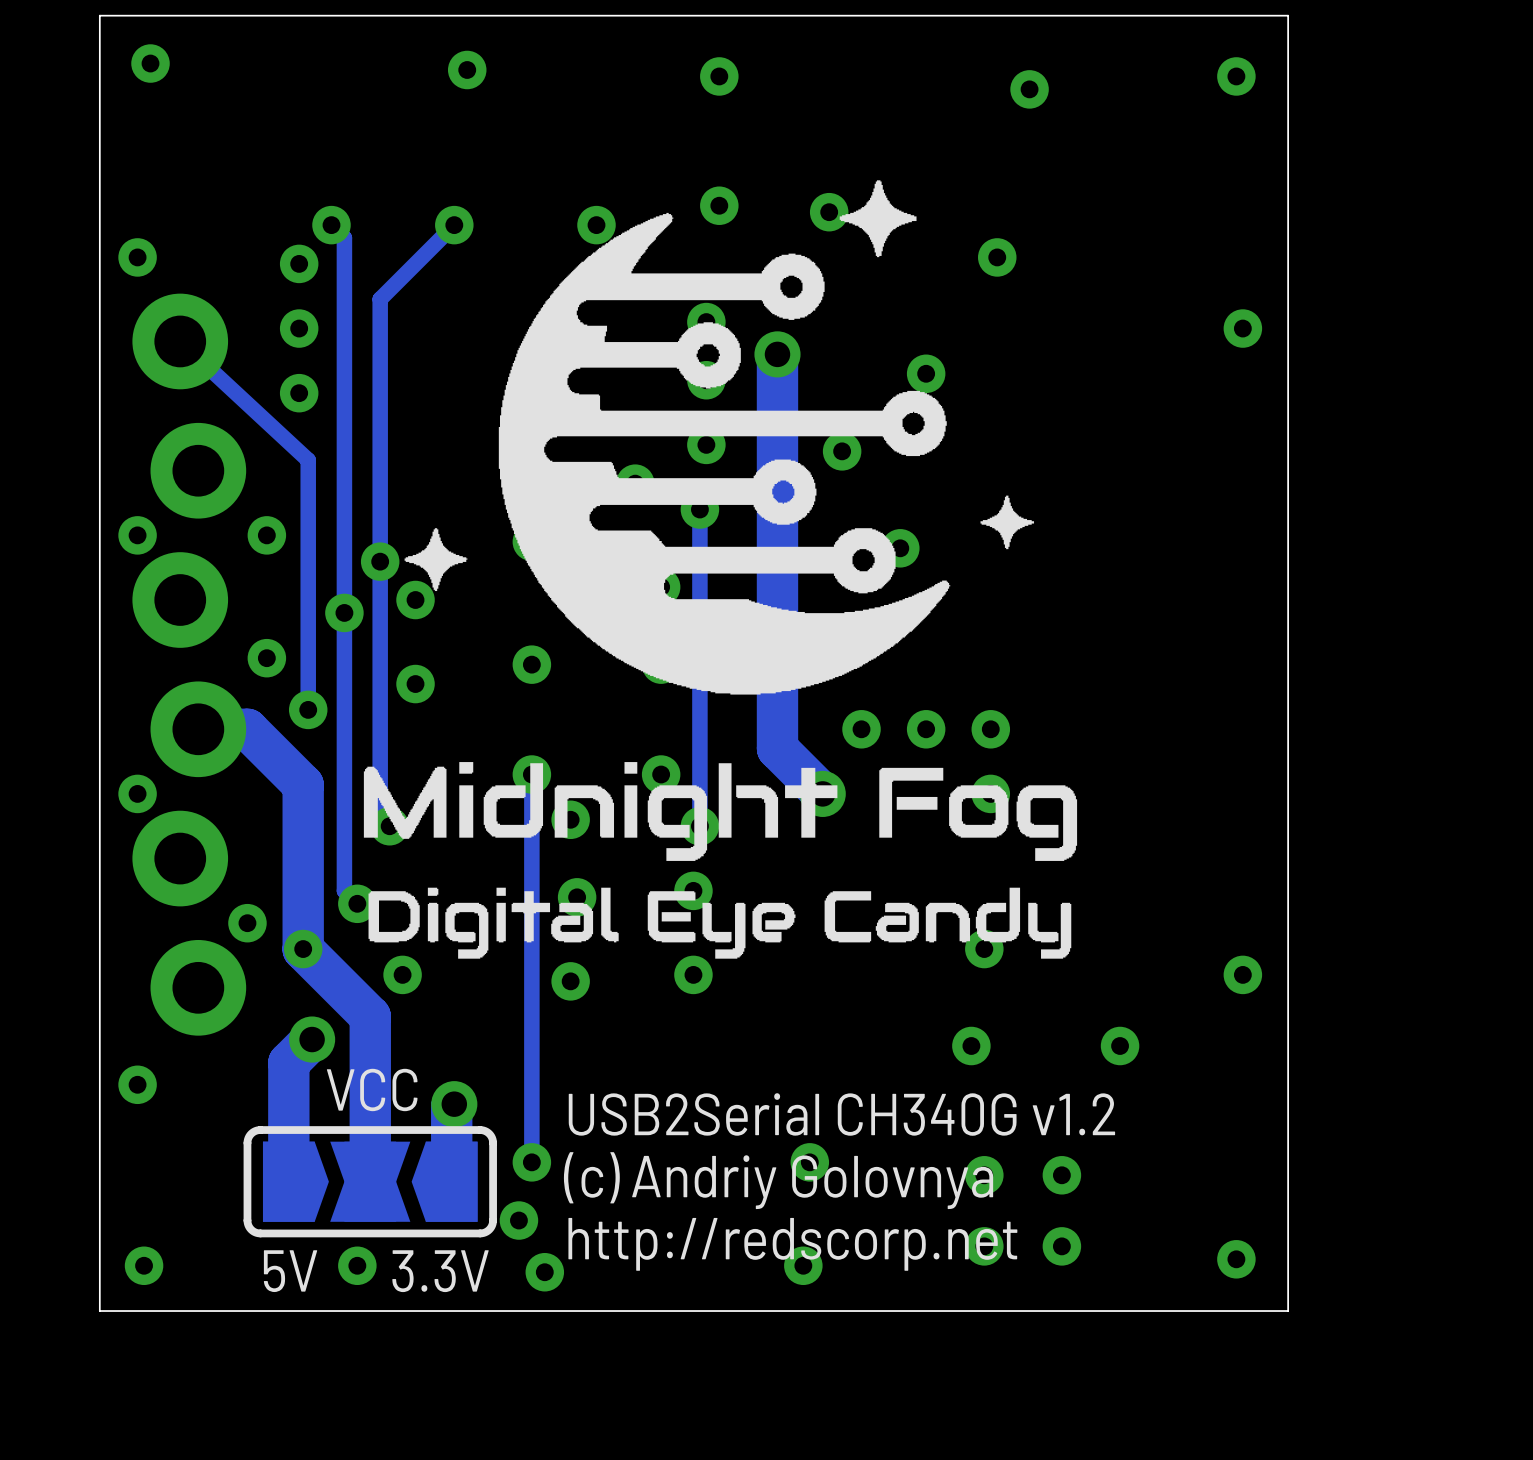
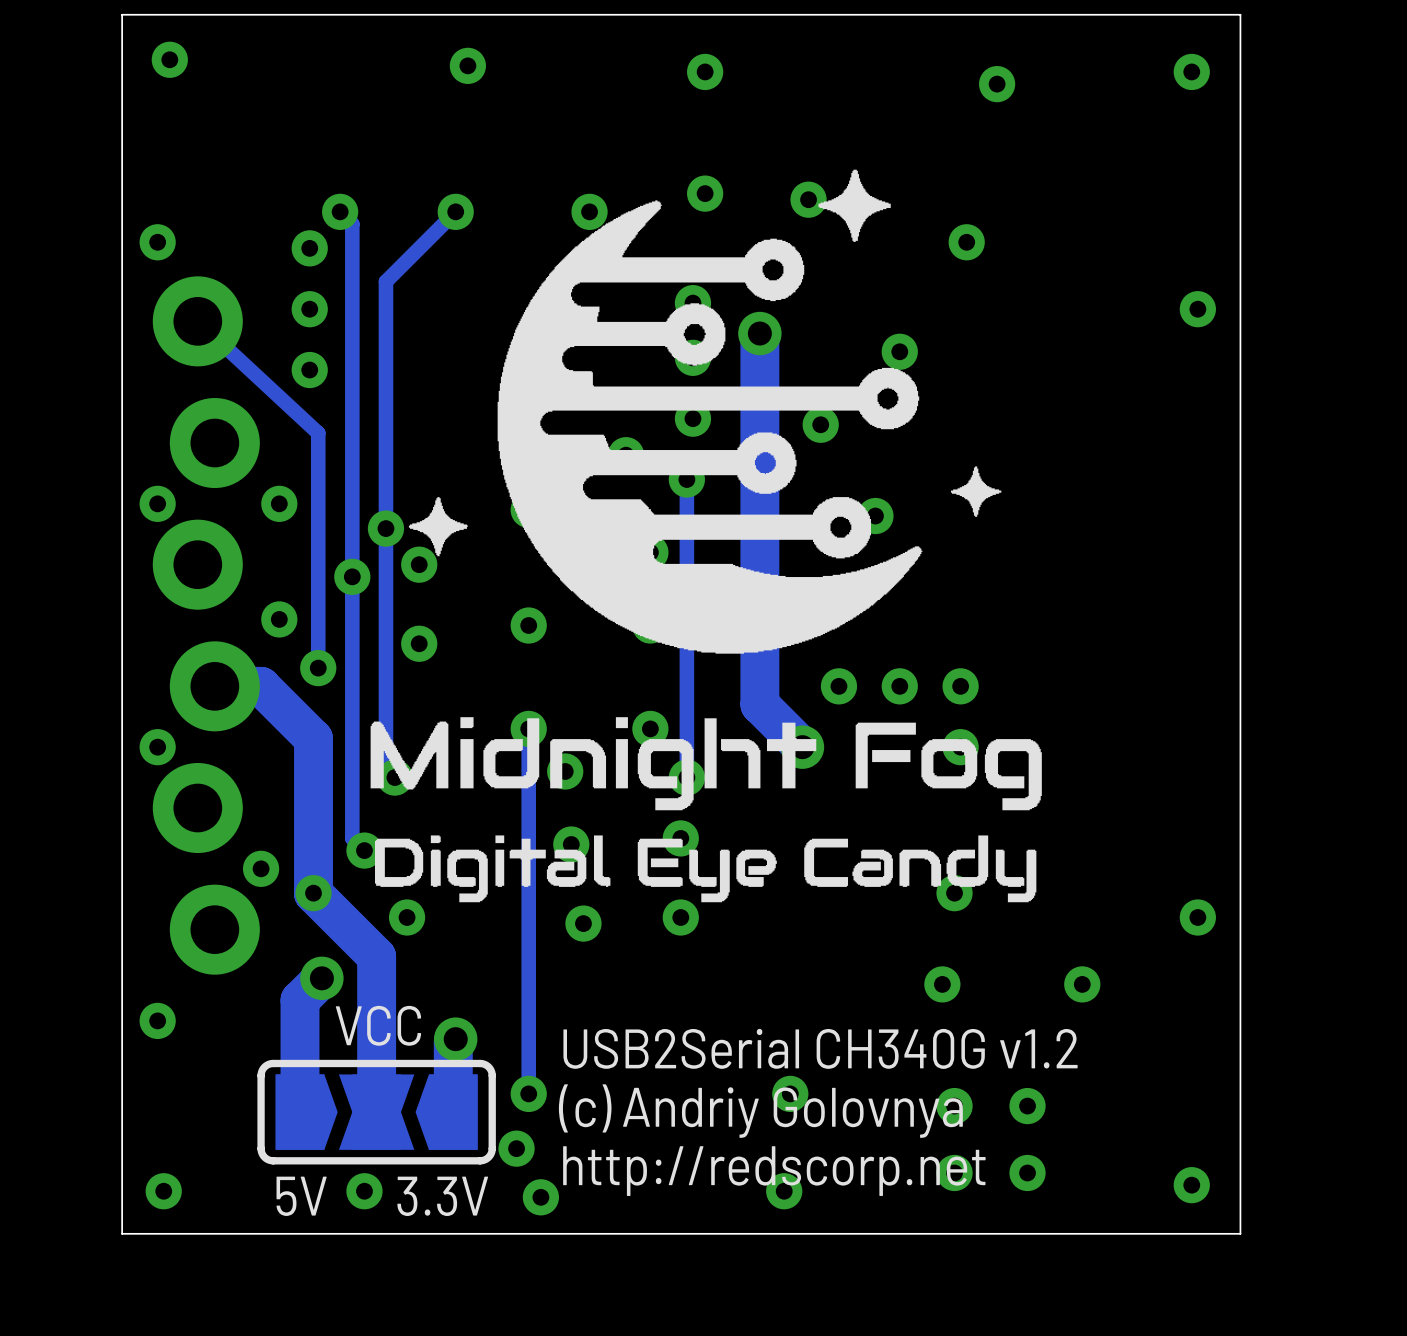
via position: (570, 981) -> (583, 923)

